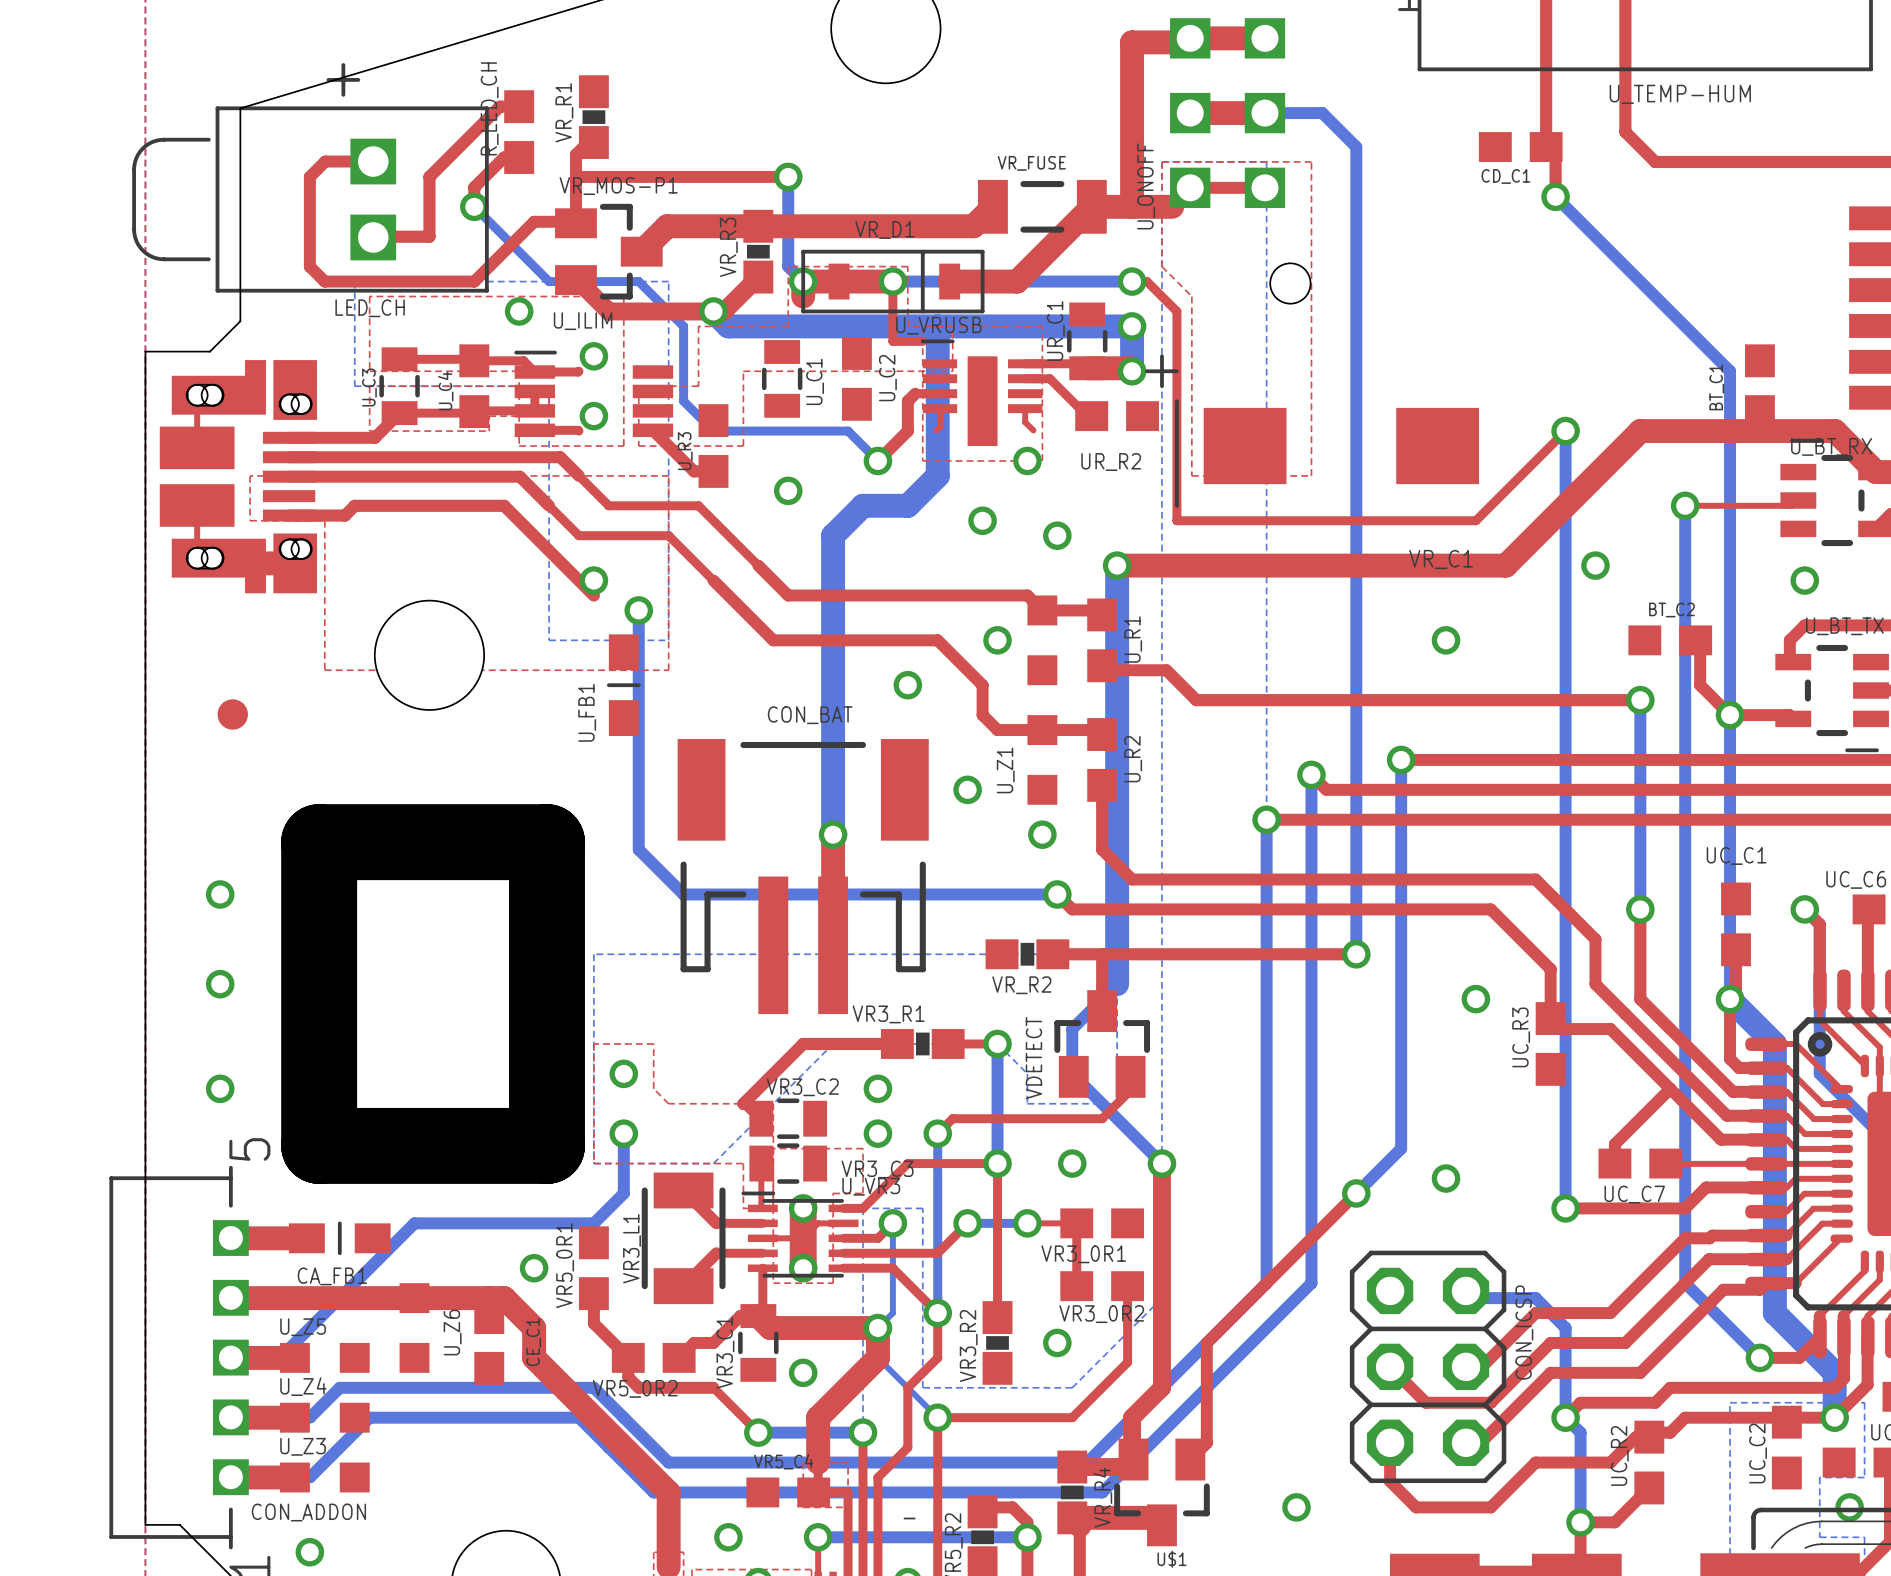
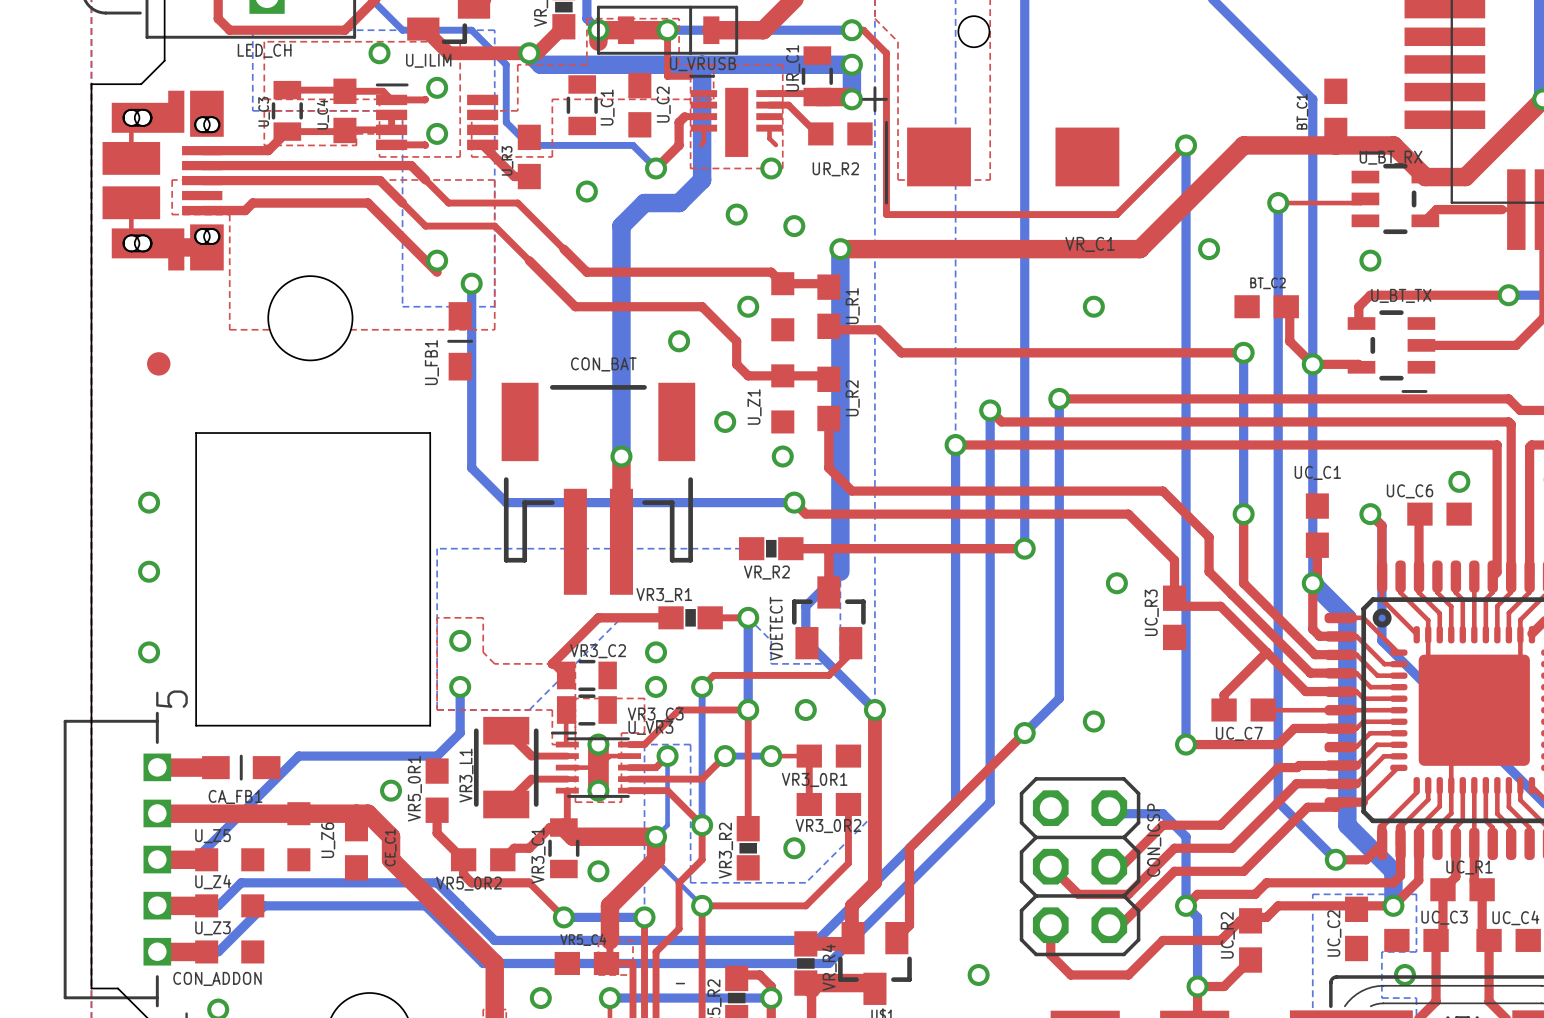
board edge: (319, 842) (319, 1145) (546, 1145) (546, 842) (319, 842) -> (196, 433) (196, 725) (430, 725) (430, 433) (196, 433)

